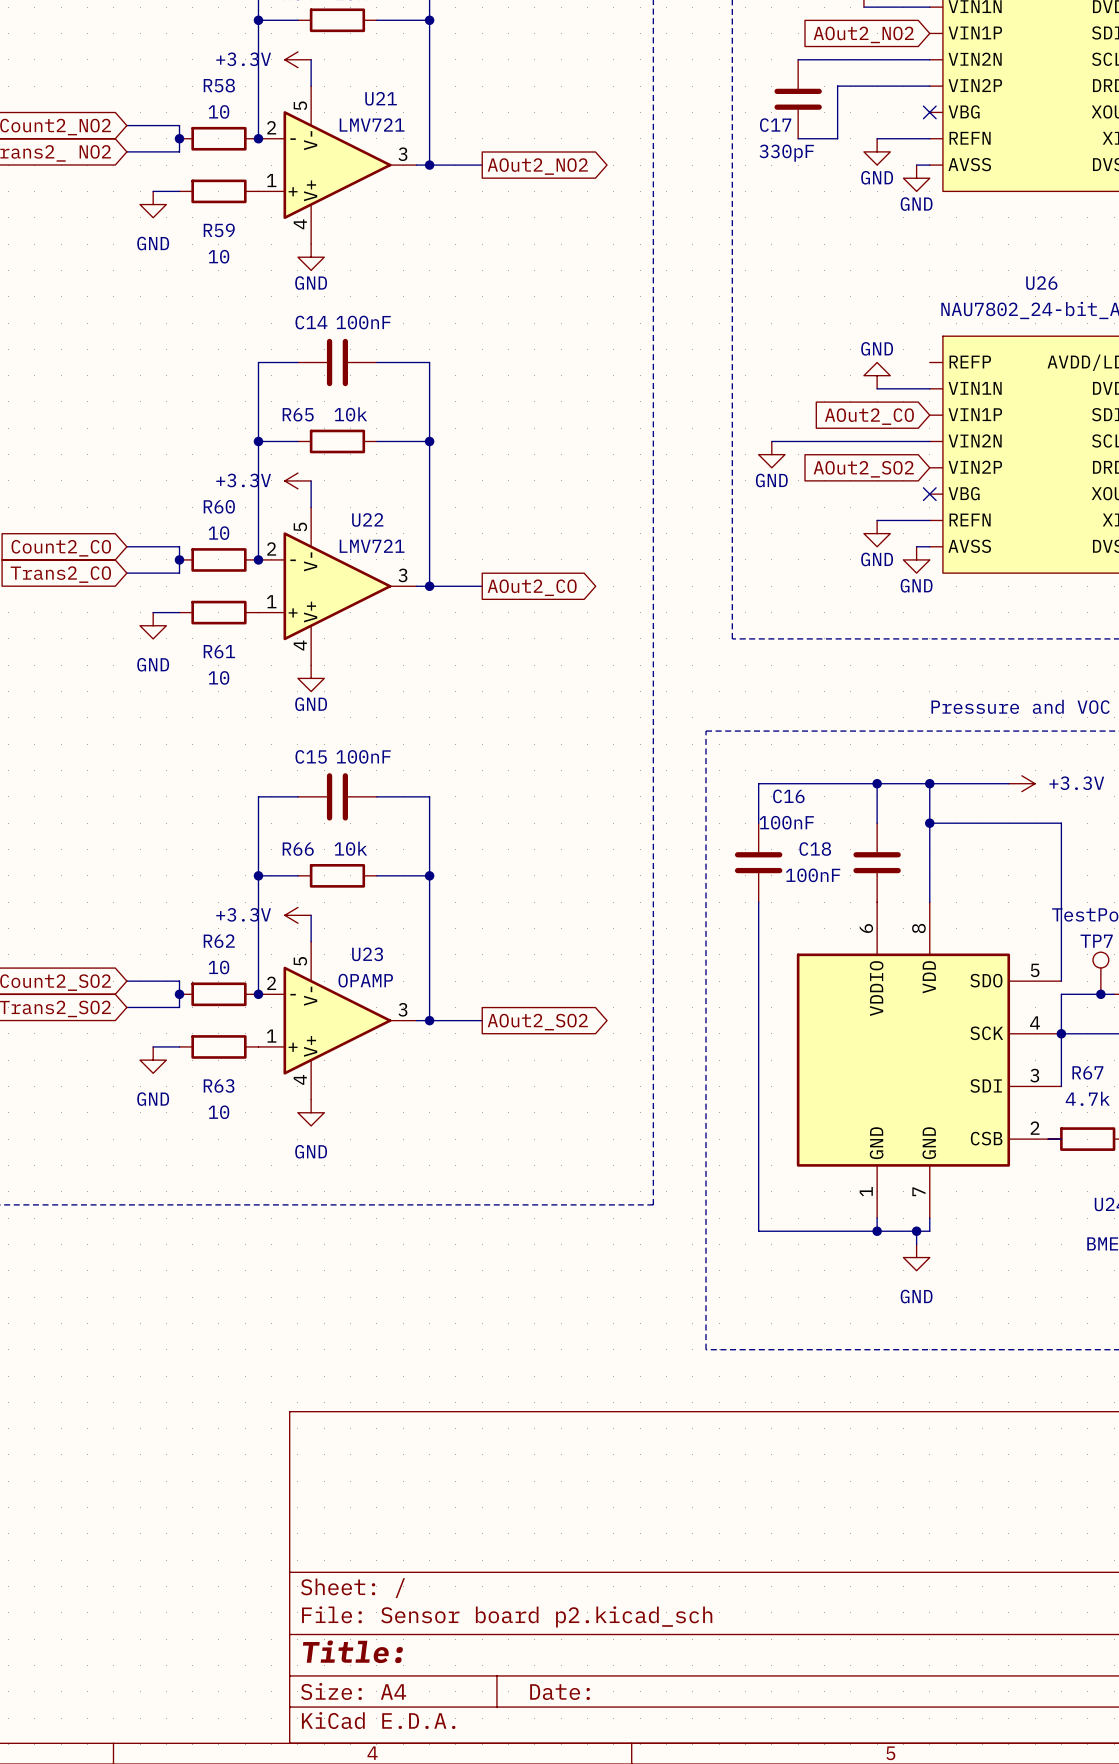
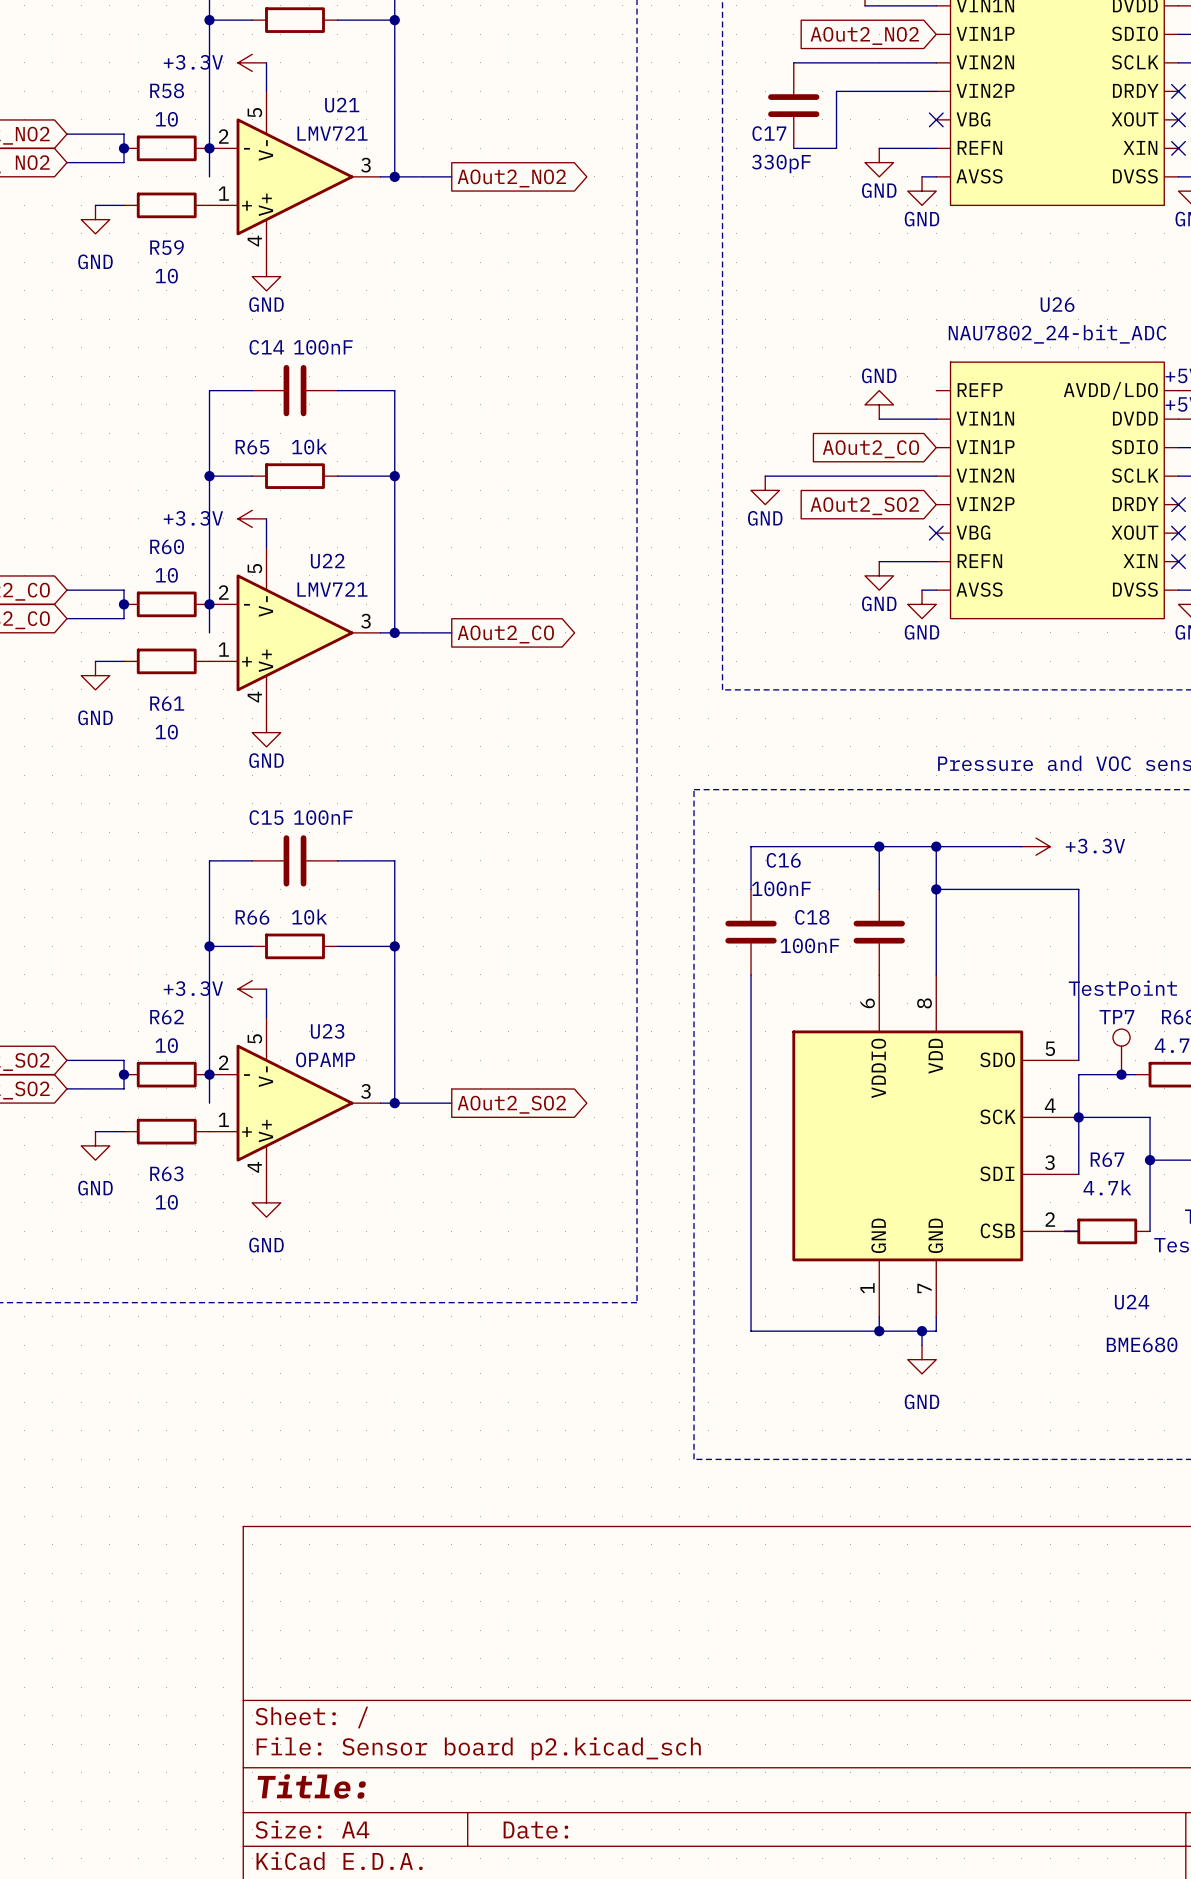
wire: none -> (209, 148) (209, 176)
wire: none -> (209, 604) (209, 632)
wire: none -> (209, 1074) (209, 1103)

